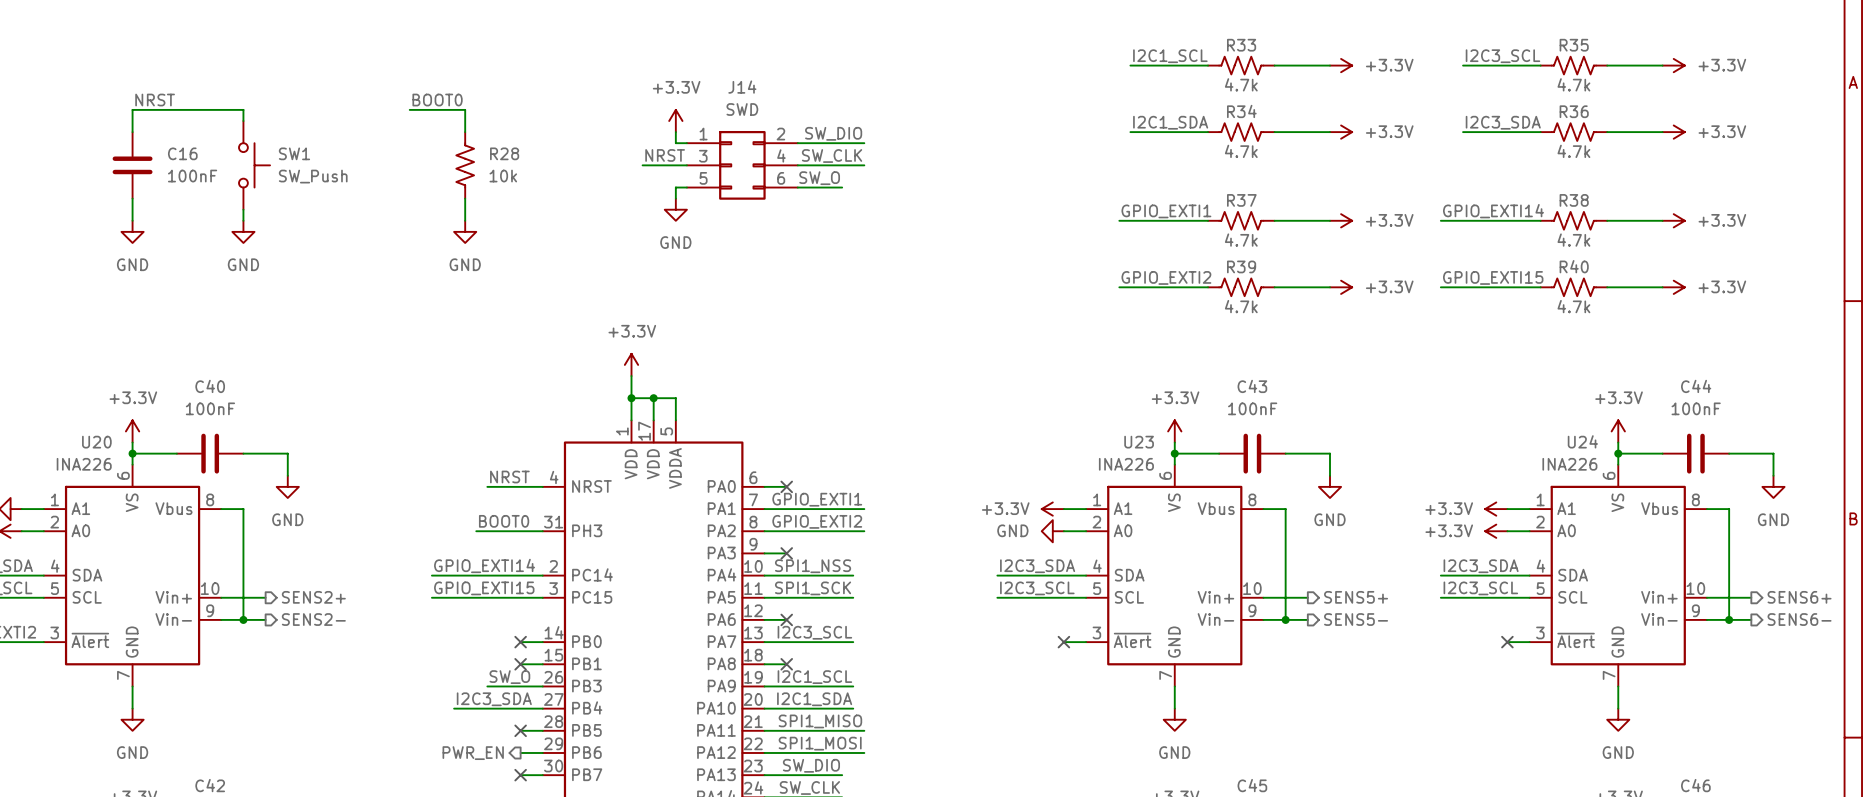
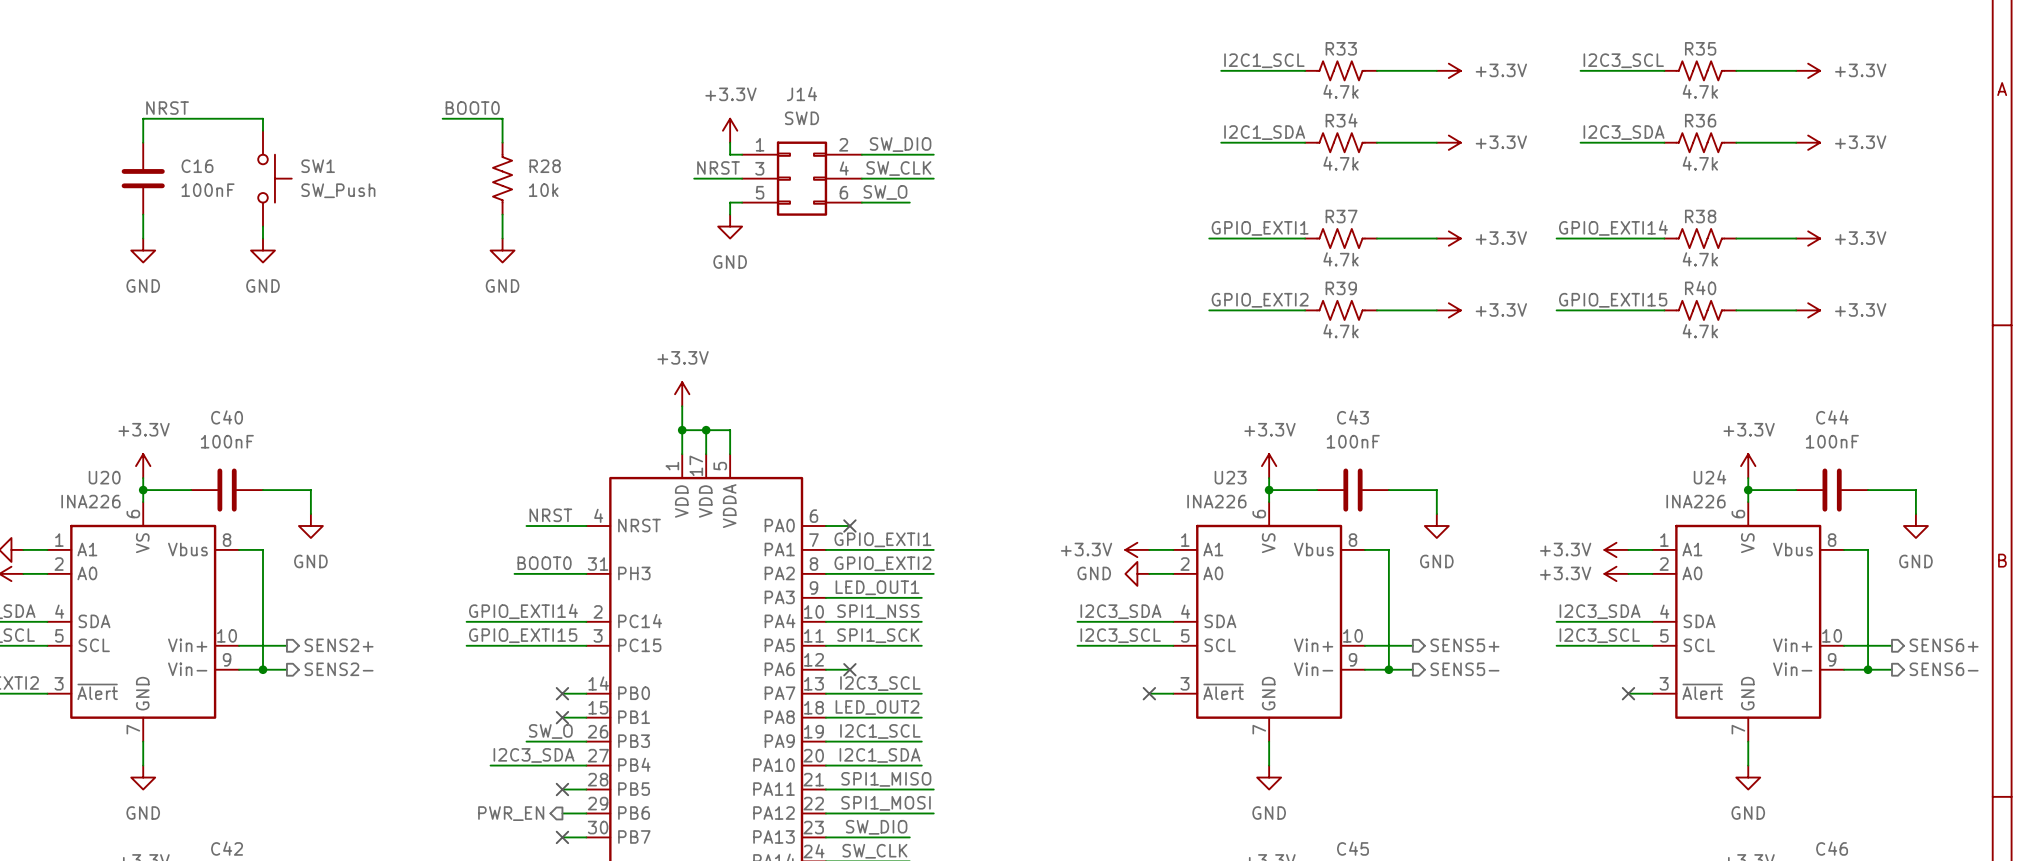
label: none -> LED_OUT1 (877, 587)
wire: none -> (849, 597) (921, 597)
no-connect mark: (786, 553) -> none
label: none -> LED_OUT2 (877, 707)
wire: none -> (849, 717) (921, 717)
no-connect mark: (786, 664) -> none

